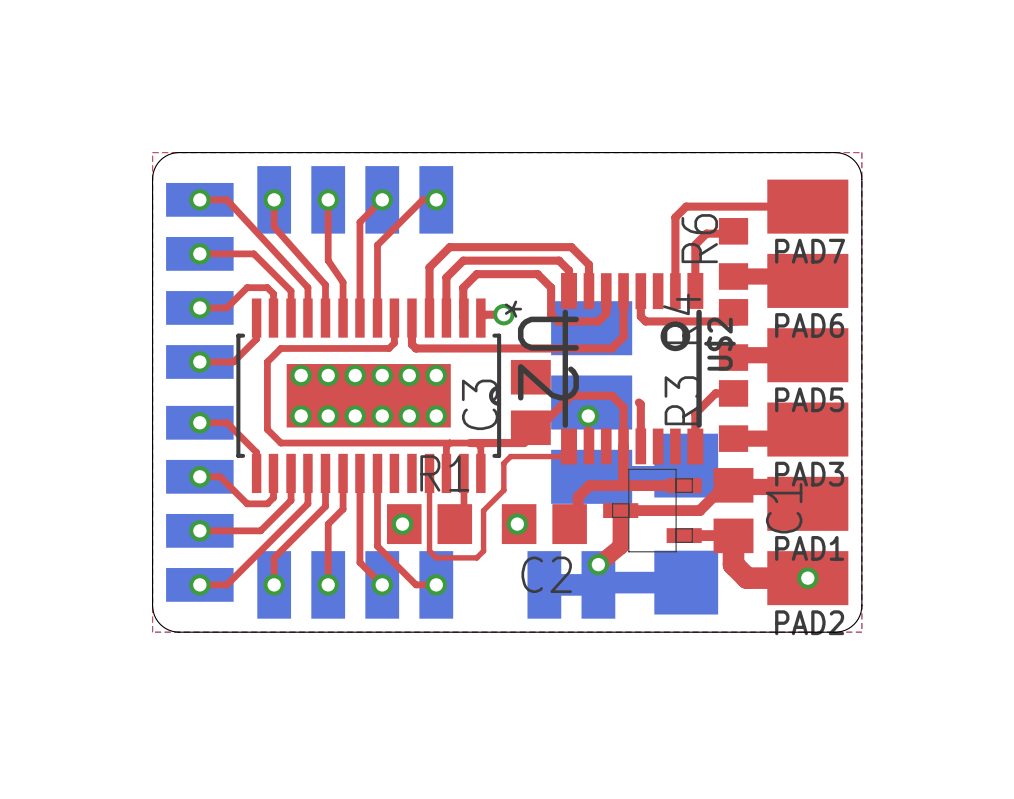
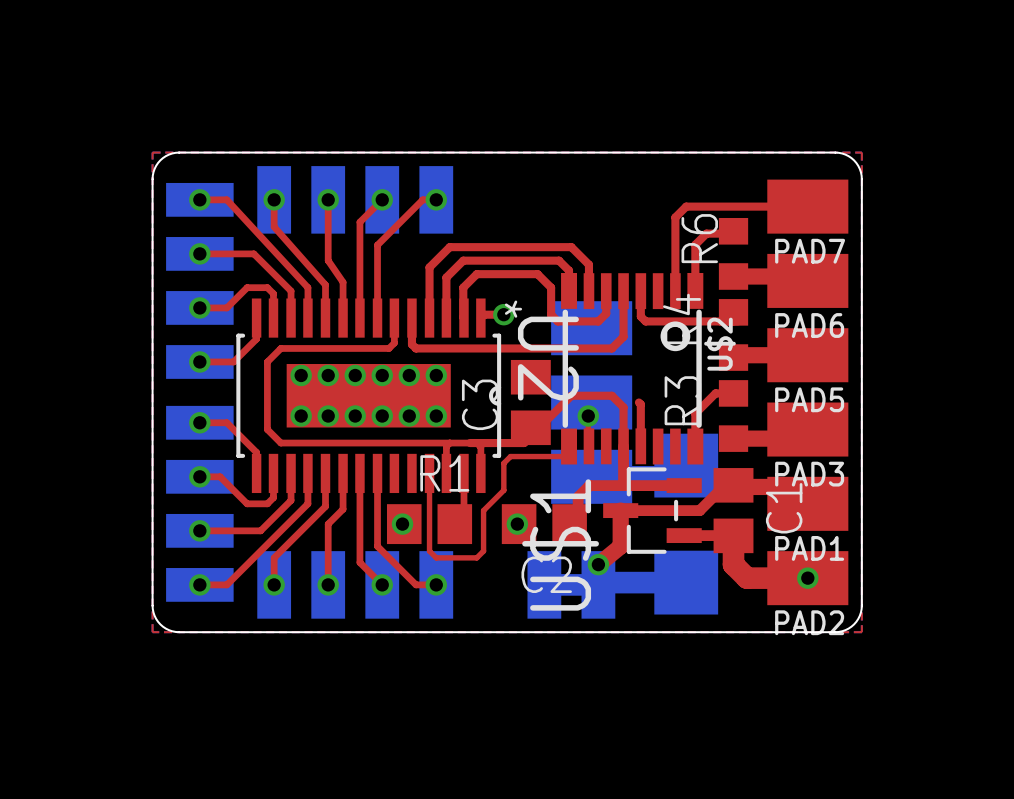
part: (652, 510) -> none
U$1: none -> (652, 510)

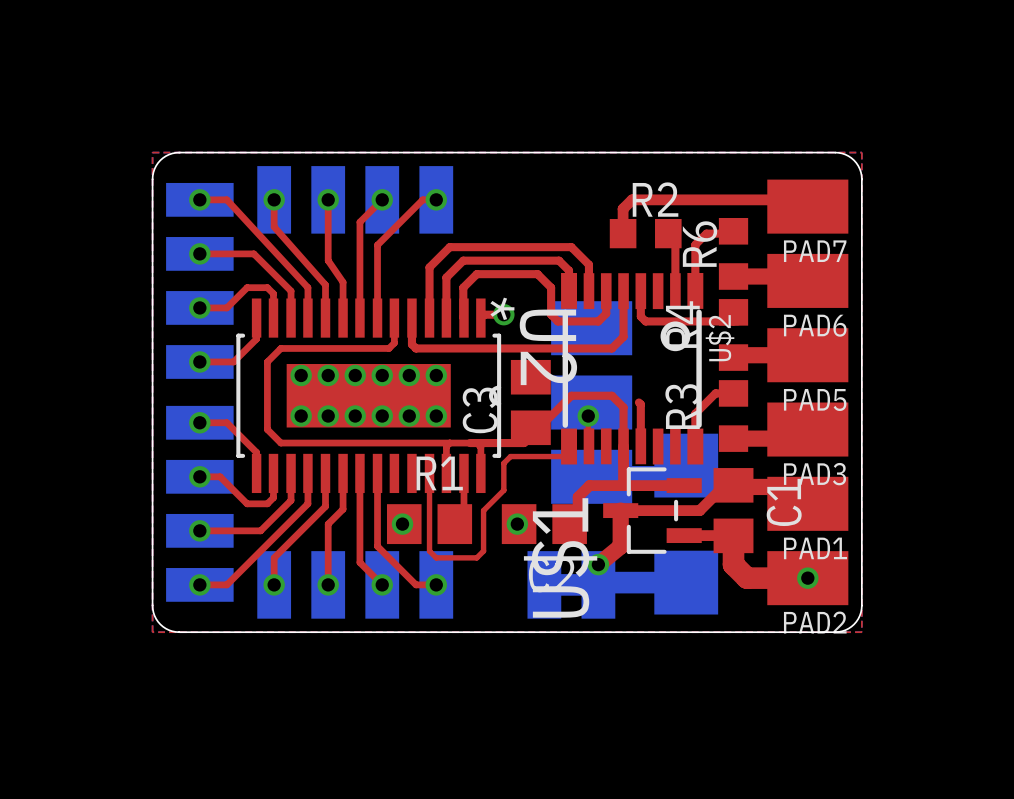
top track: (807, 206) (686, 206) (675, 217) (675, 240) -> (807, 206) (801, 199) (632, 199) (623, 208) (623, 233)
R2: none -> (645, 233)

